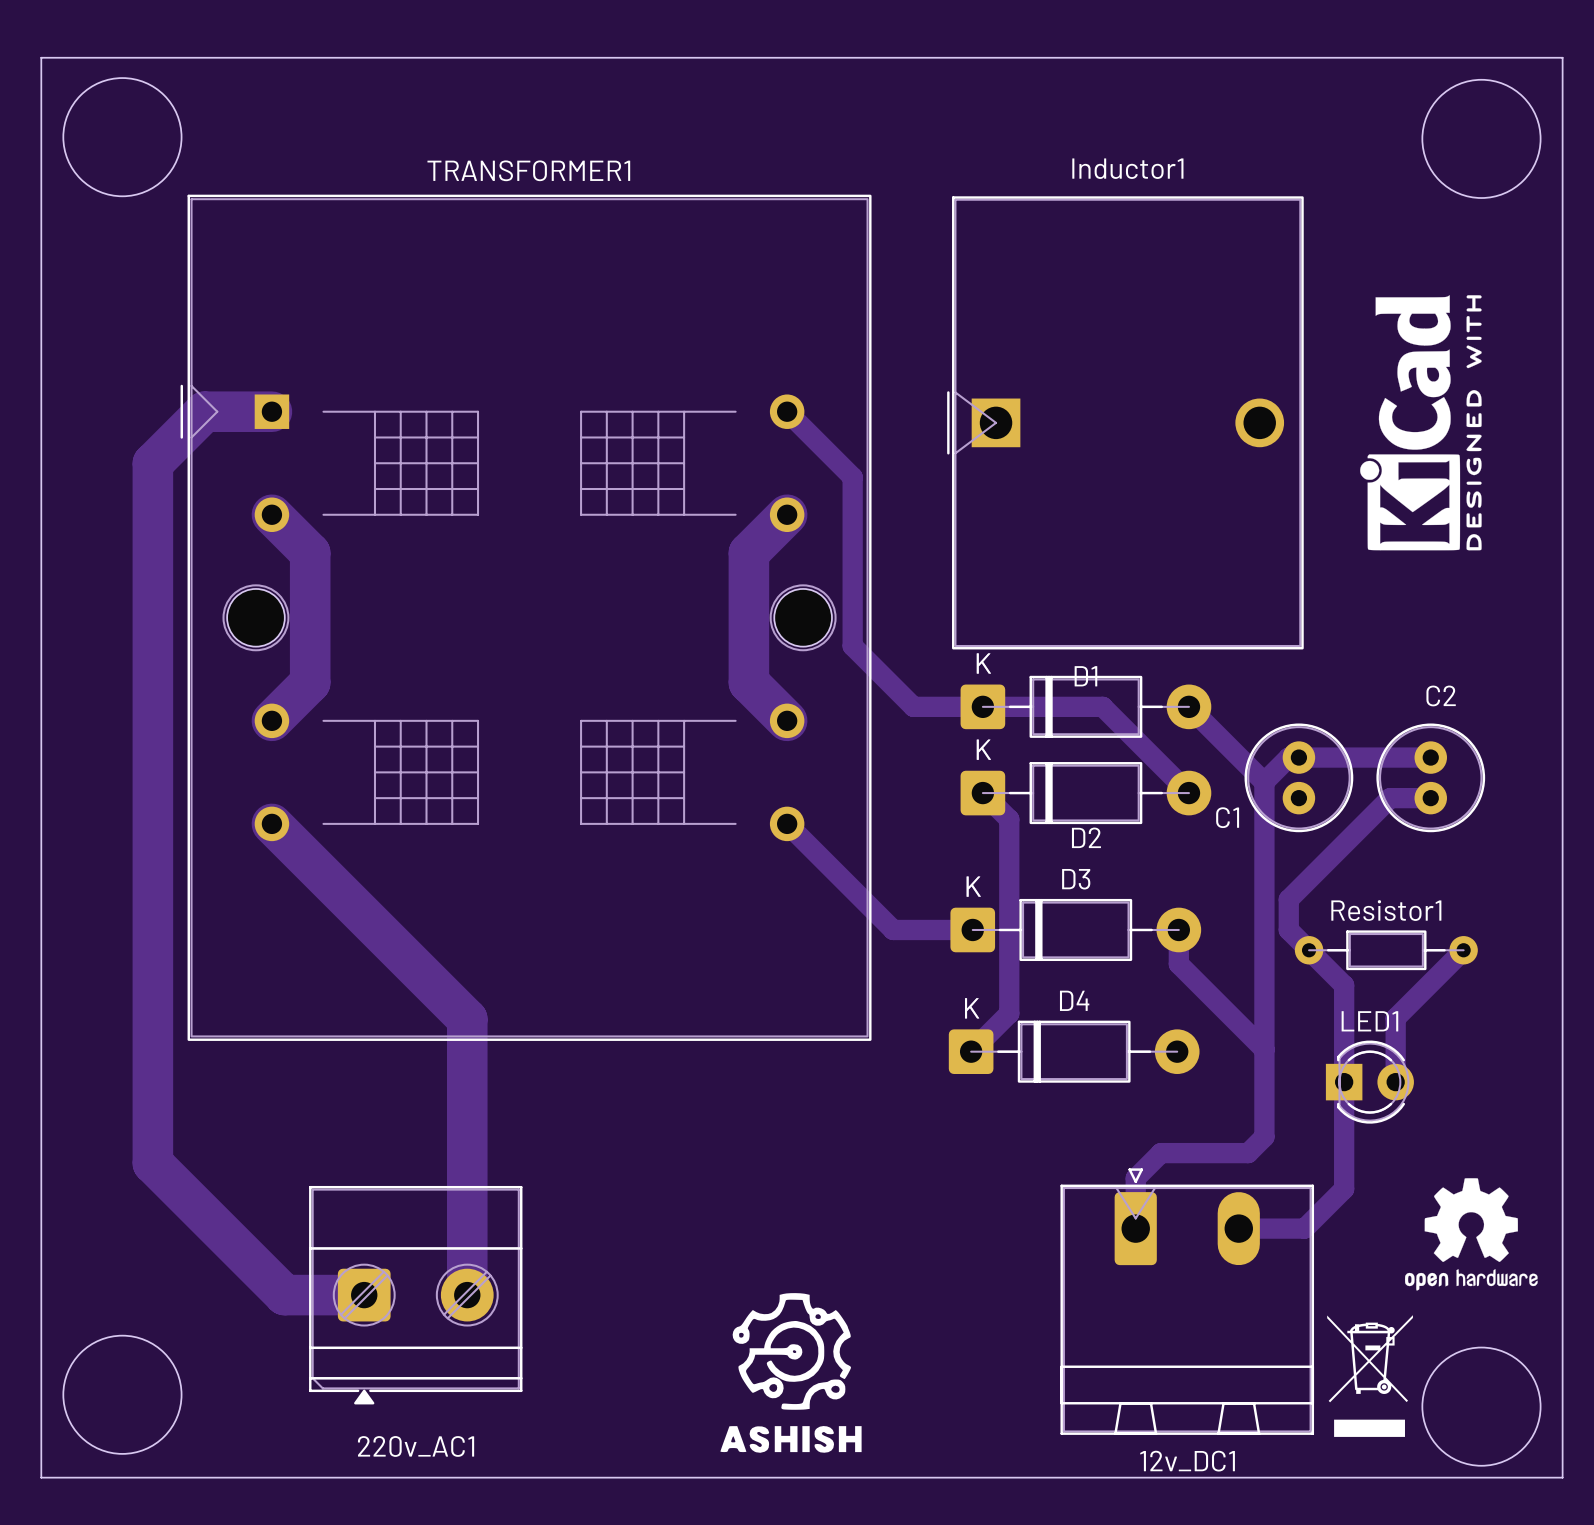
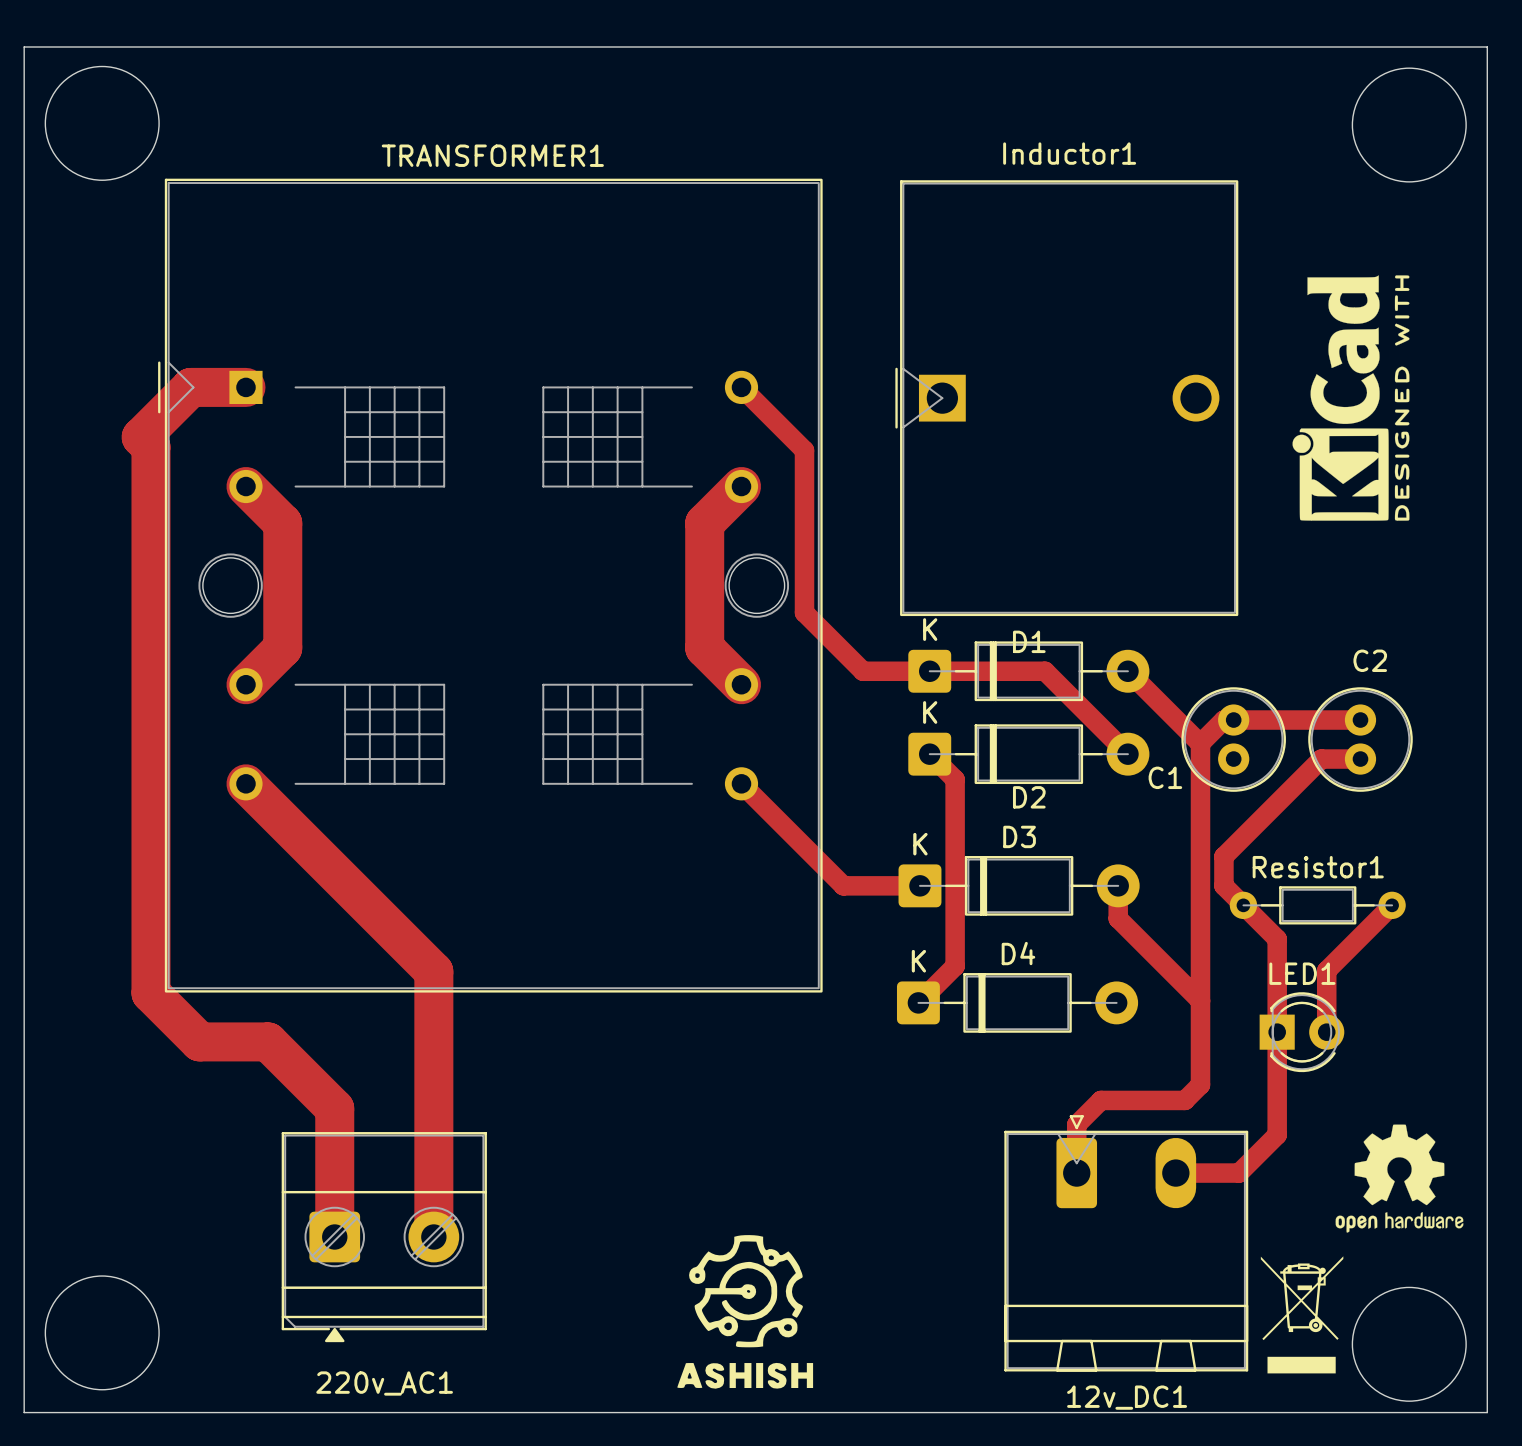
track: (214, 411) (204, 411) (152, 463) (152, 1163) (284, 1295) (364, 1295) -> (190, 387) (141, 437) (150, 446) (150, 993) (199, 1041) (268, 1041) (334, 1108) (334, 1237)

